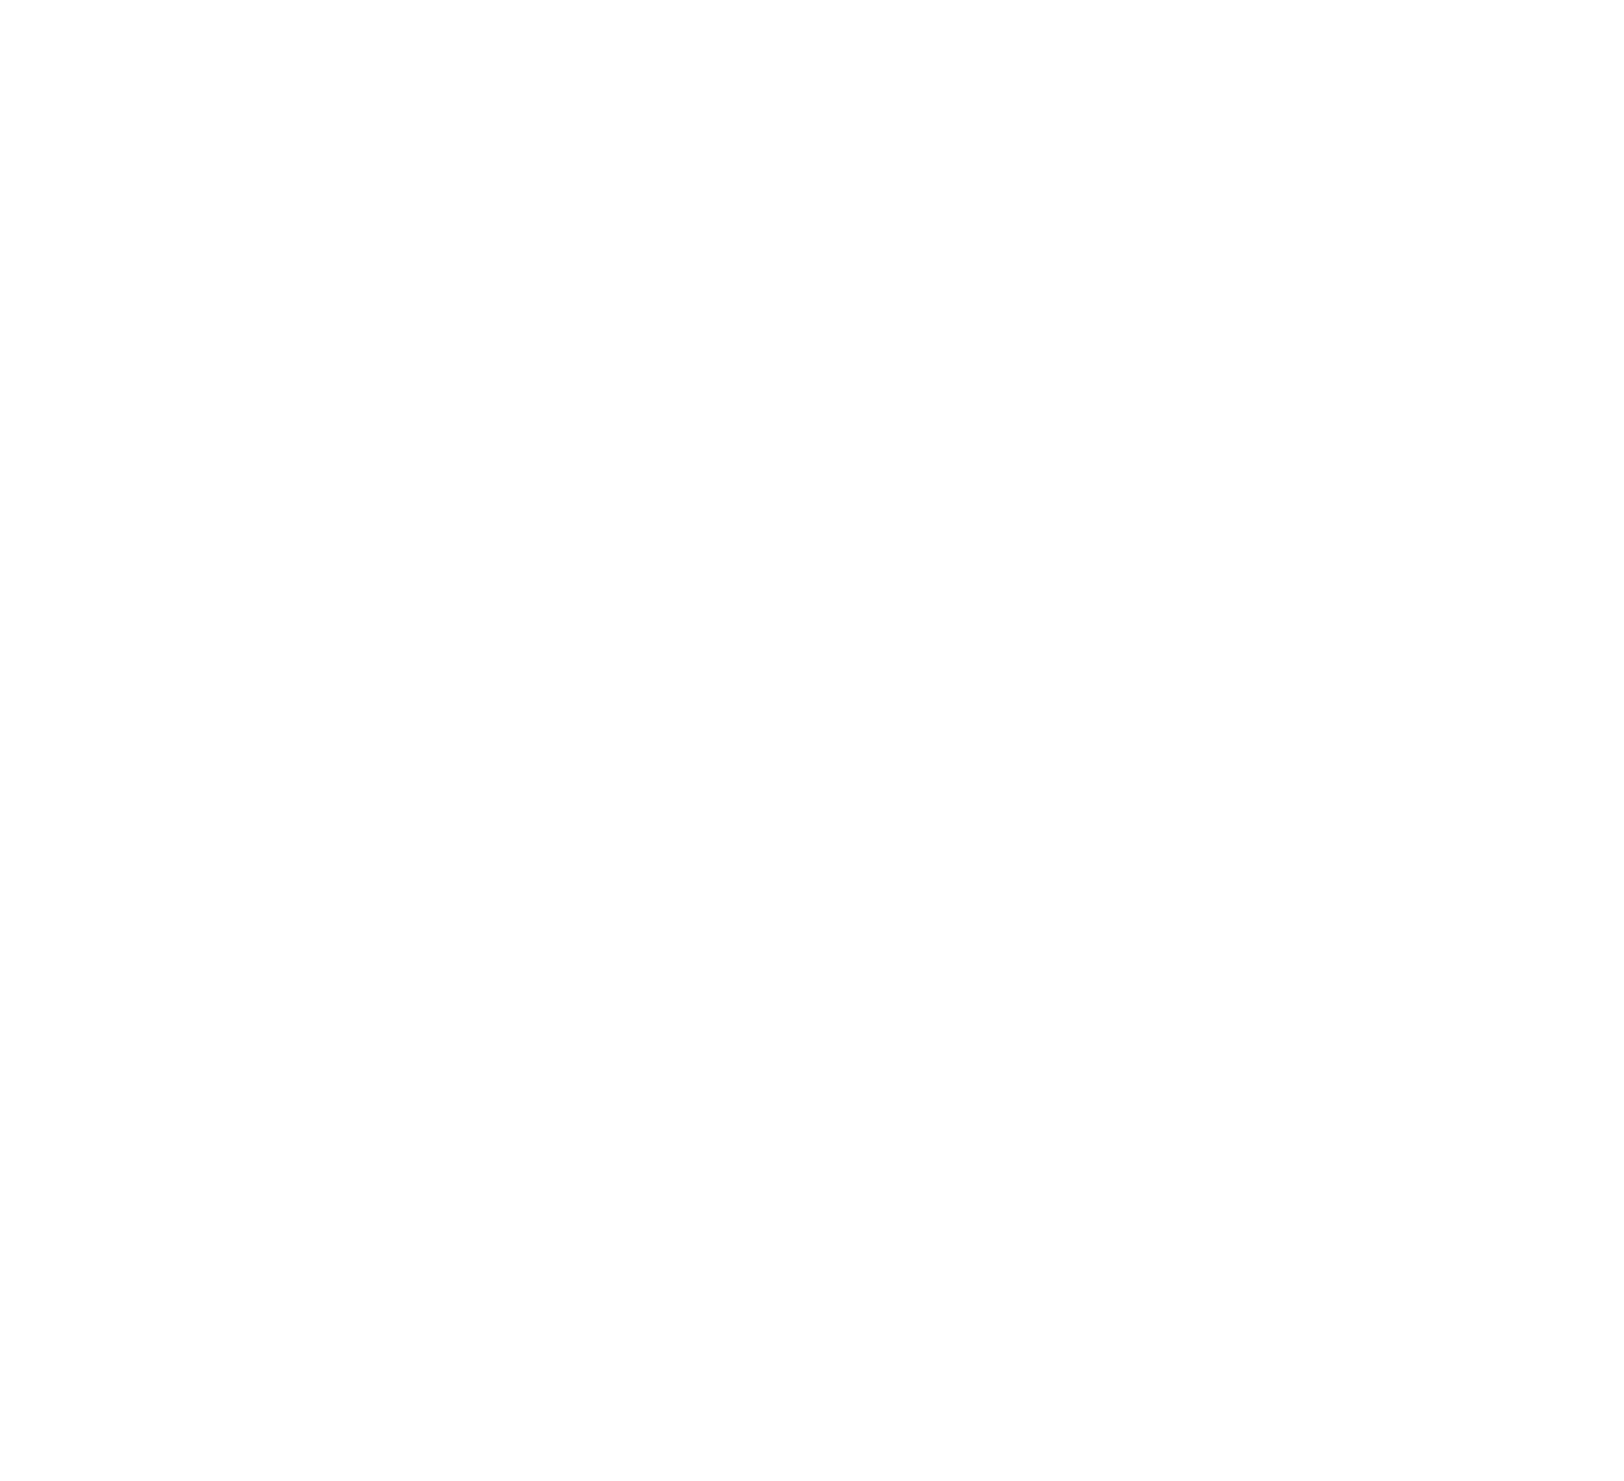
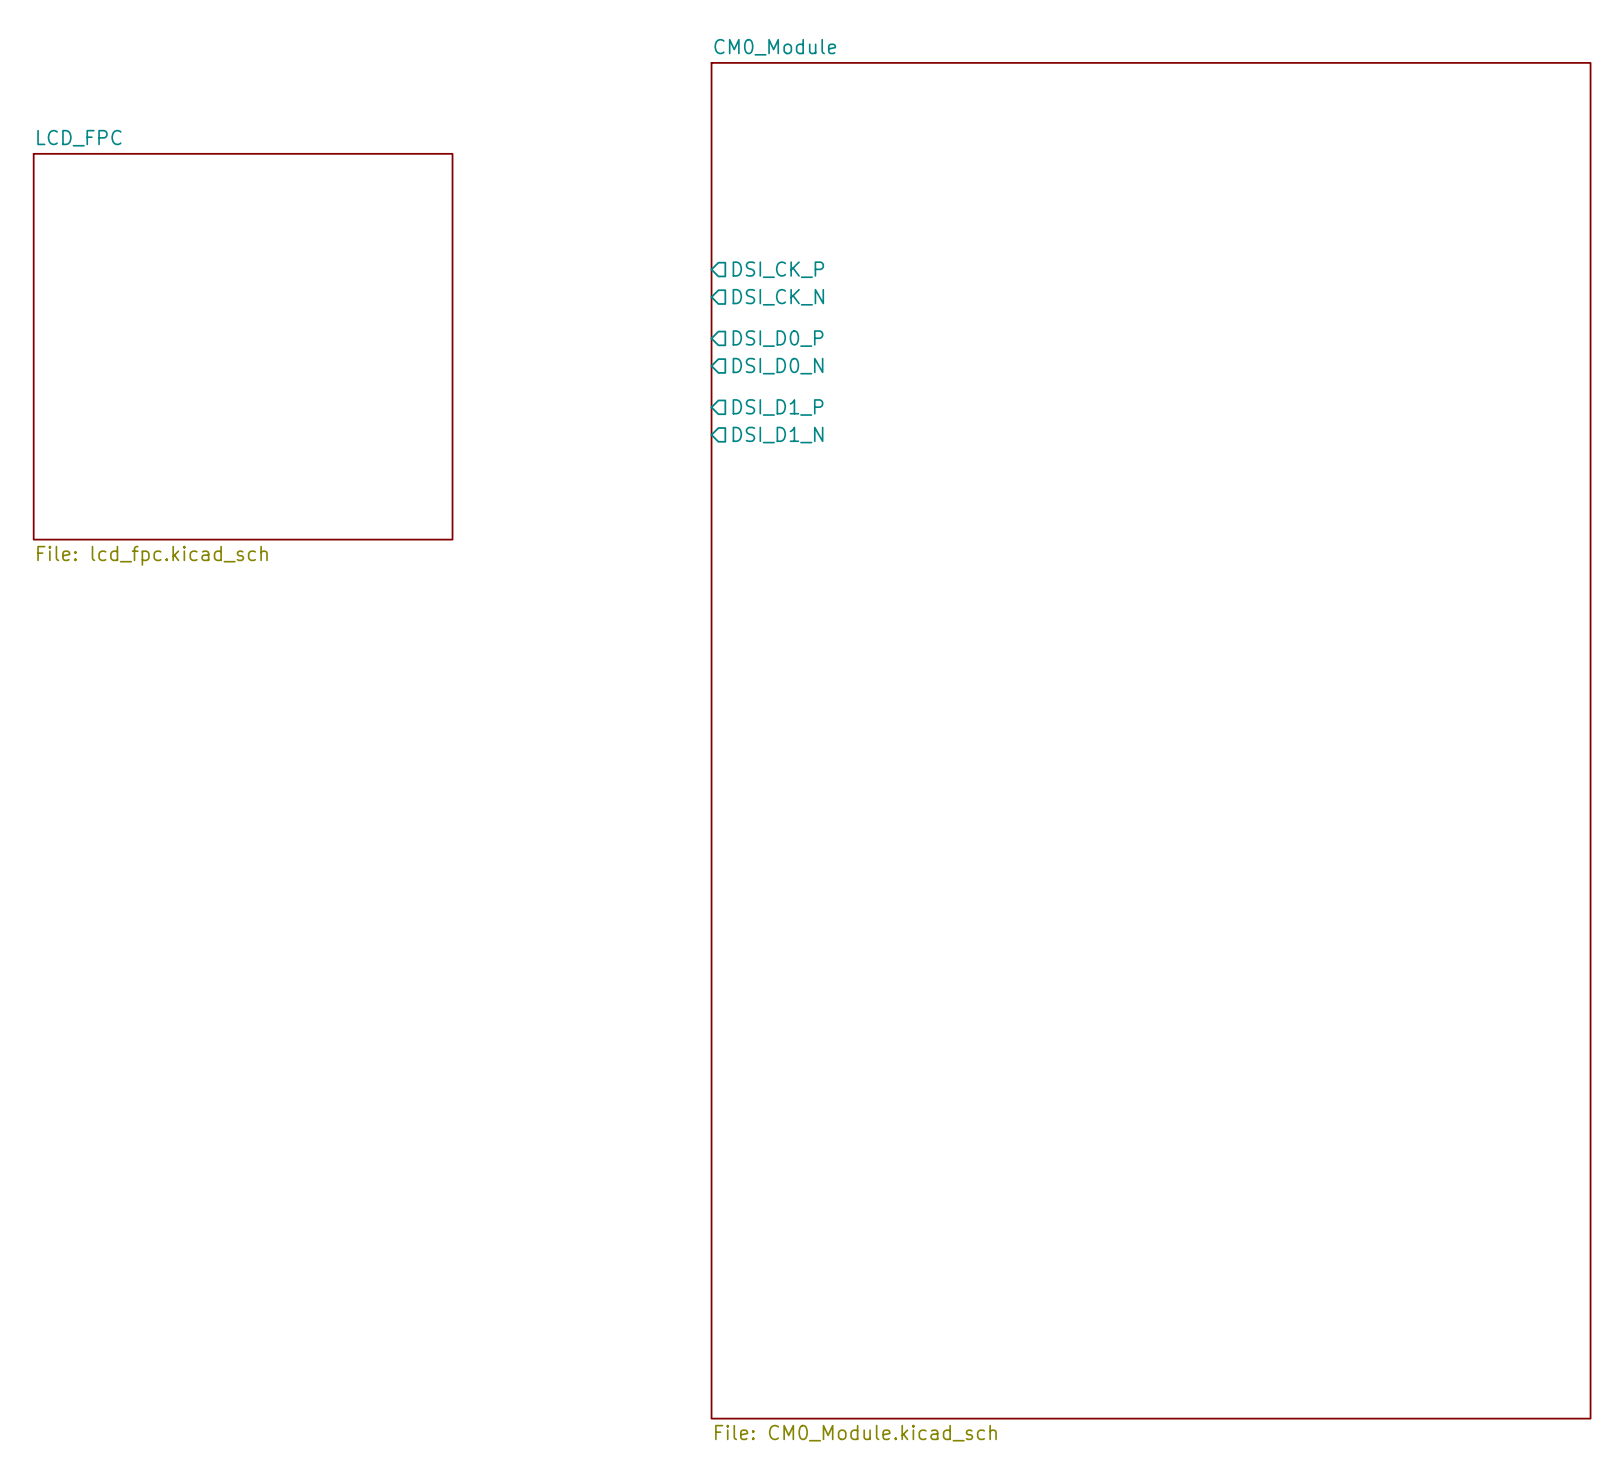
sheet pin: none -> DSI_CK_P (778, 269)
sheet pin: none -> DSI_CK_N (778, 297)
sheet pin: none -> DSI_D0_P (778, 338)
sheet LCD_FPC: none -> File: lcd_fpc.kicad_sch (243, 346)
sheet pin: none -> DSI_D0_N (778, 366)
sheet pin: none -> DSI_D1_P (778, 407)
sheet pin: none -> DSI_D1_N (778, 435)
sheet CM0_Module: none -> File: CM0_Module.kicad_sch (1151, 740)

